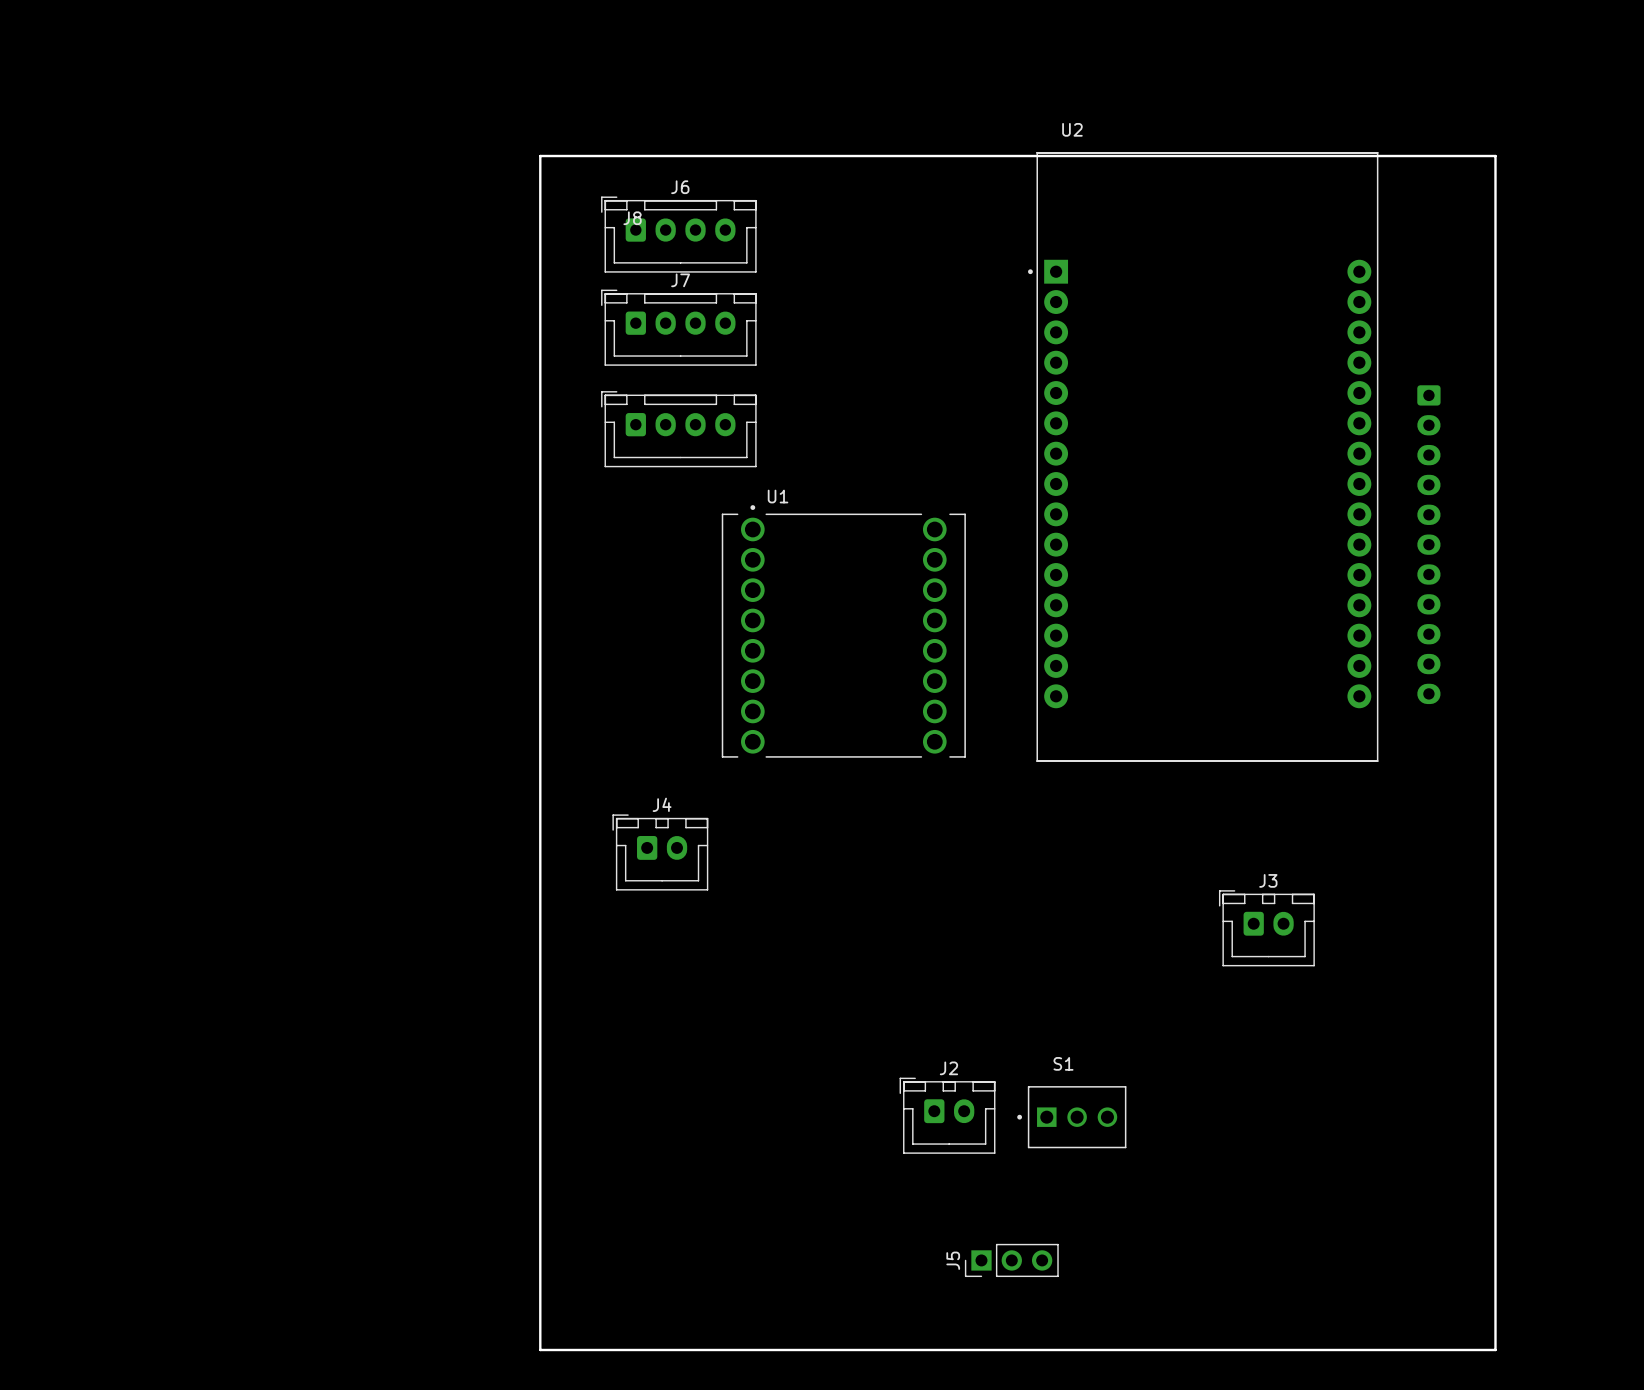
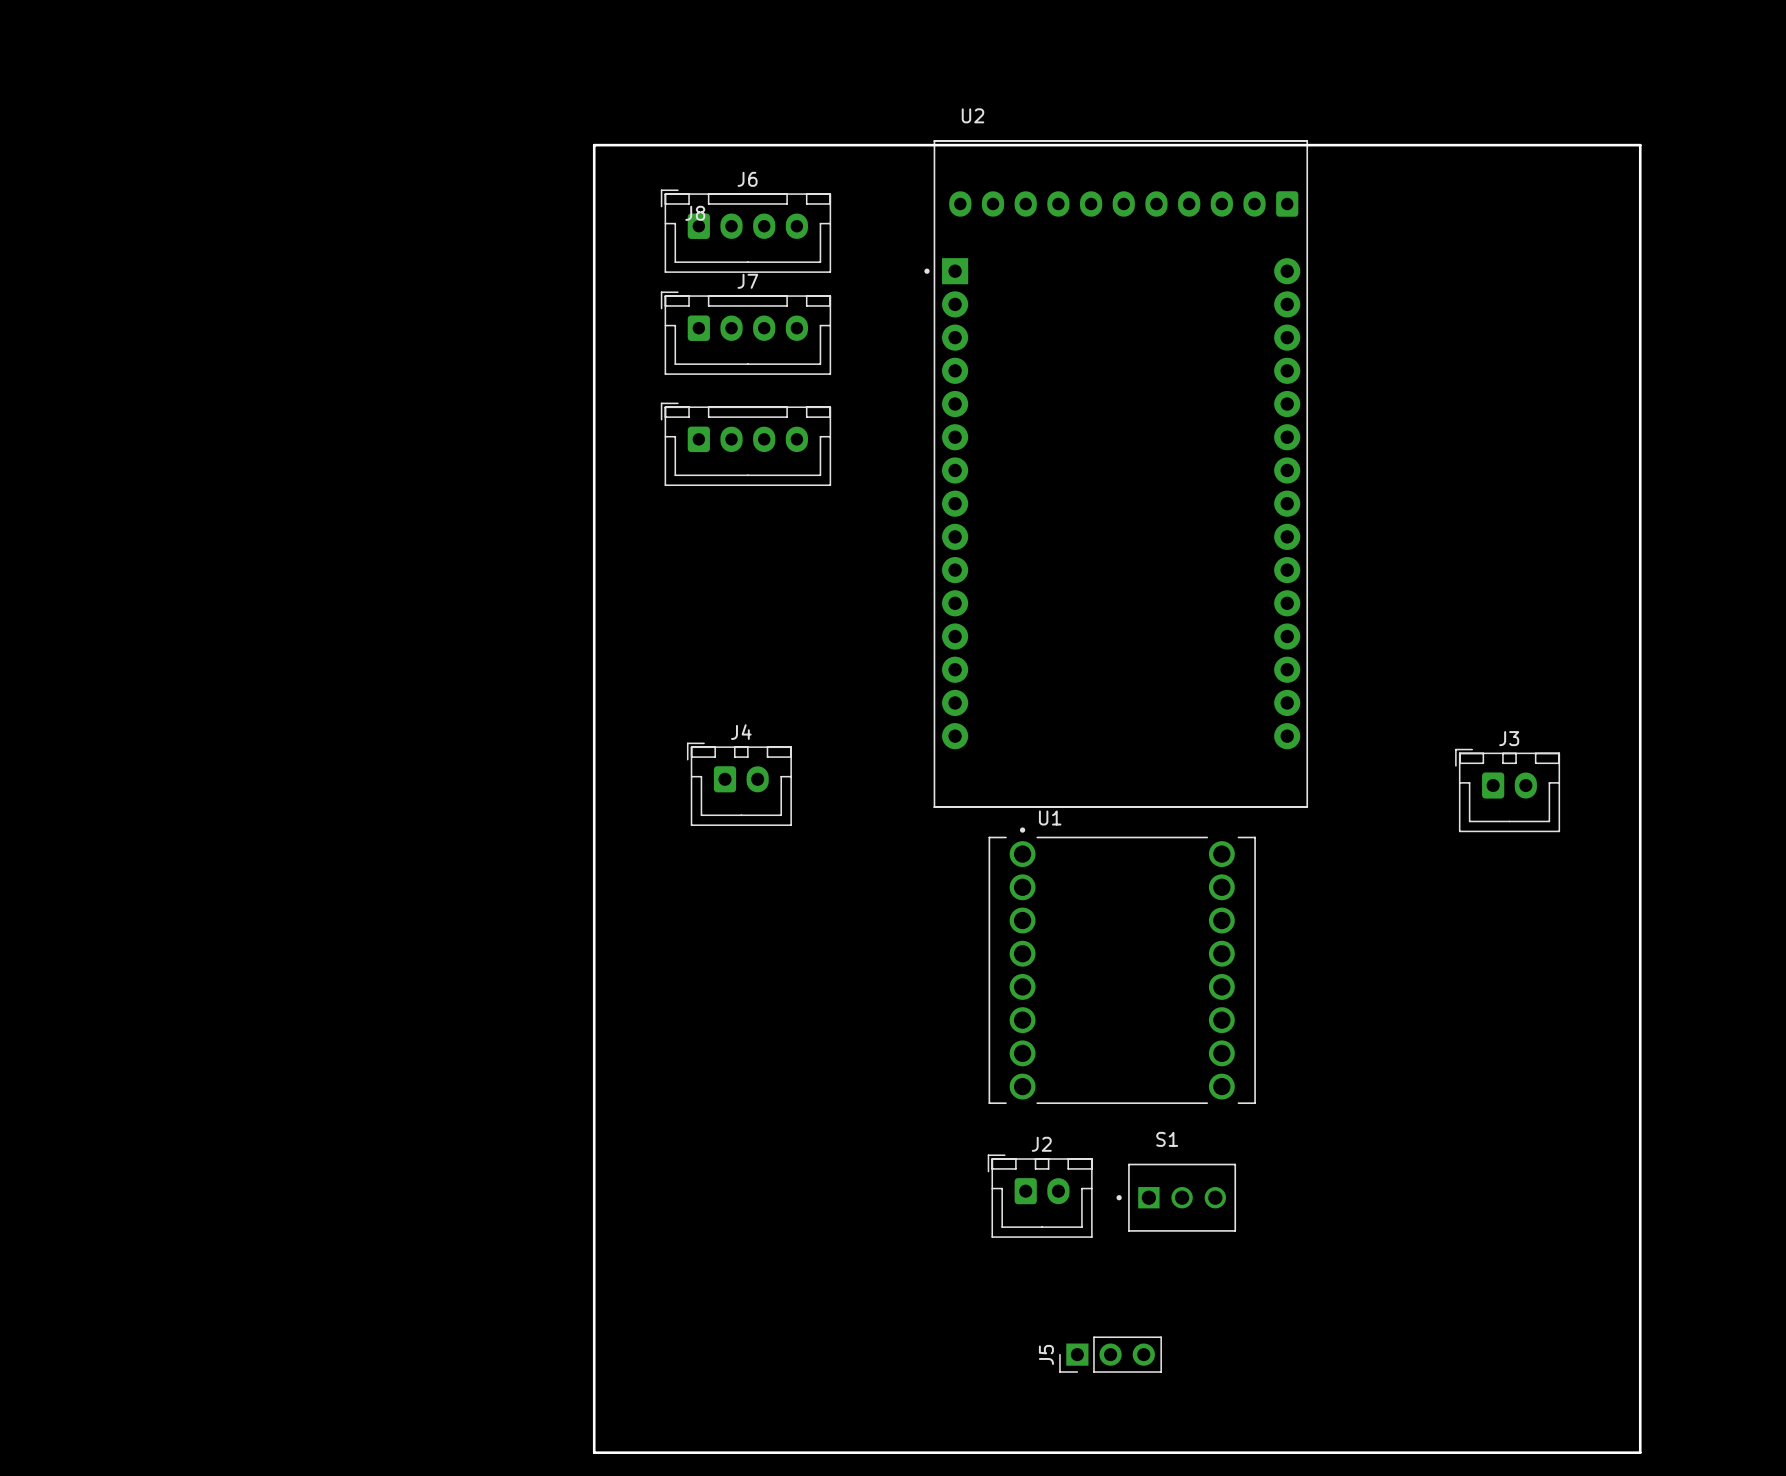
part: none -> (1123, 203)
U2 position: (1203, 456) -> (1116, 474)
part: (1428, 544) -> none
U1 position: (843, 631) -> (1122, 965)
J4 position: (660, 852) -> (739, 784)
J3 position: (1266, 928) -> (1507, 790)

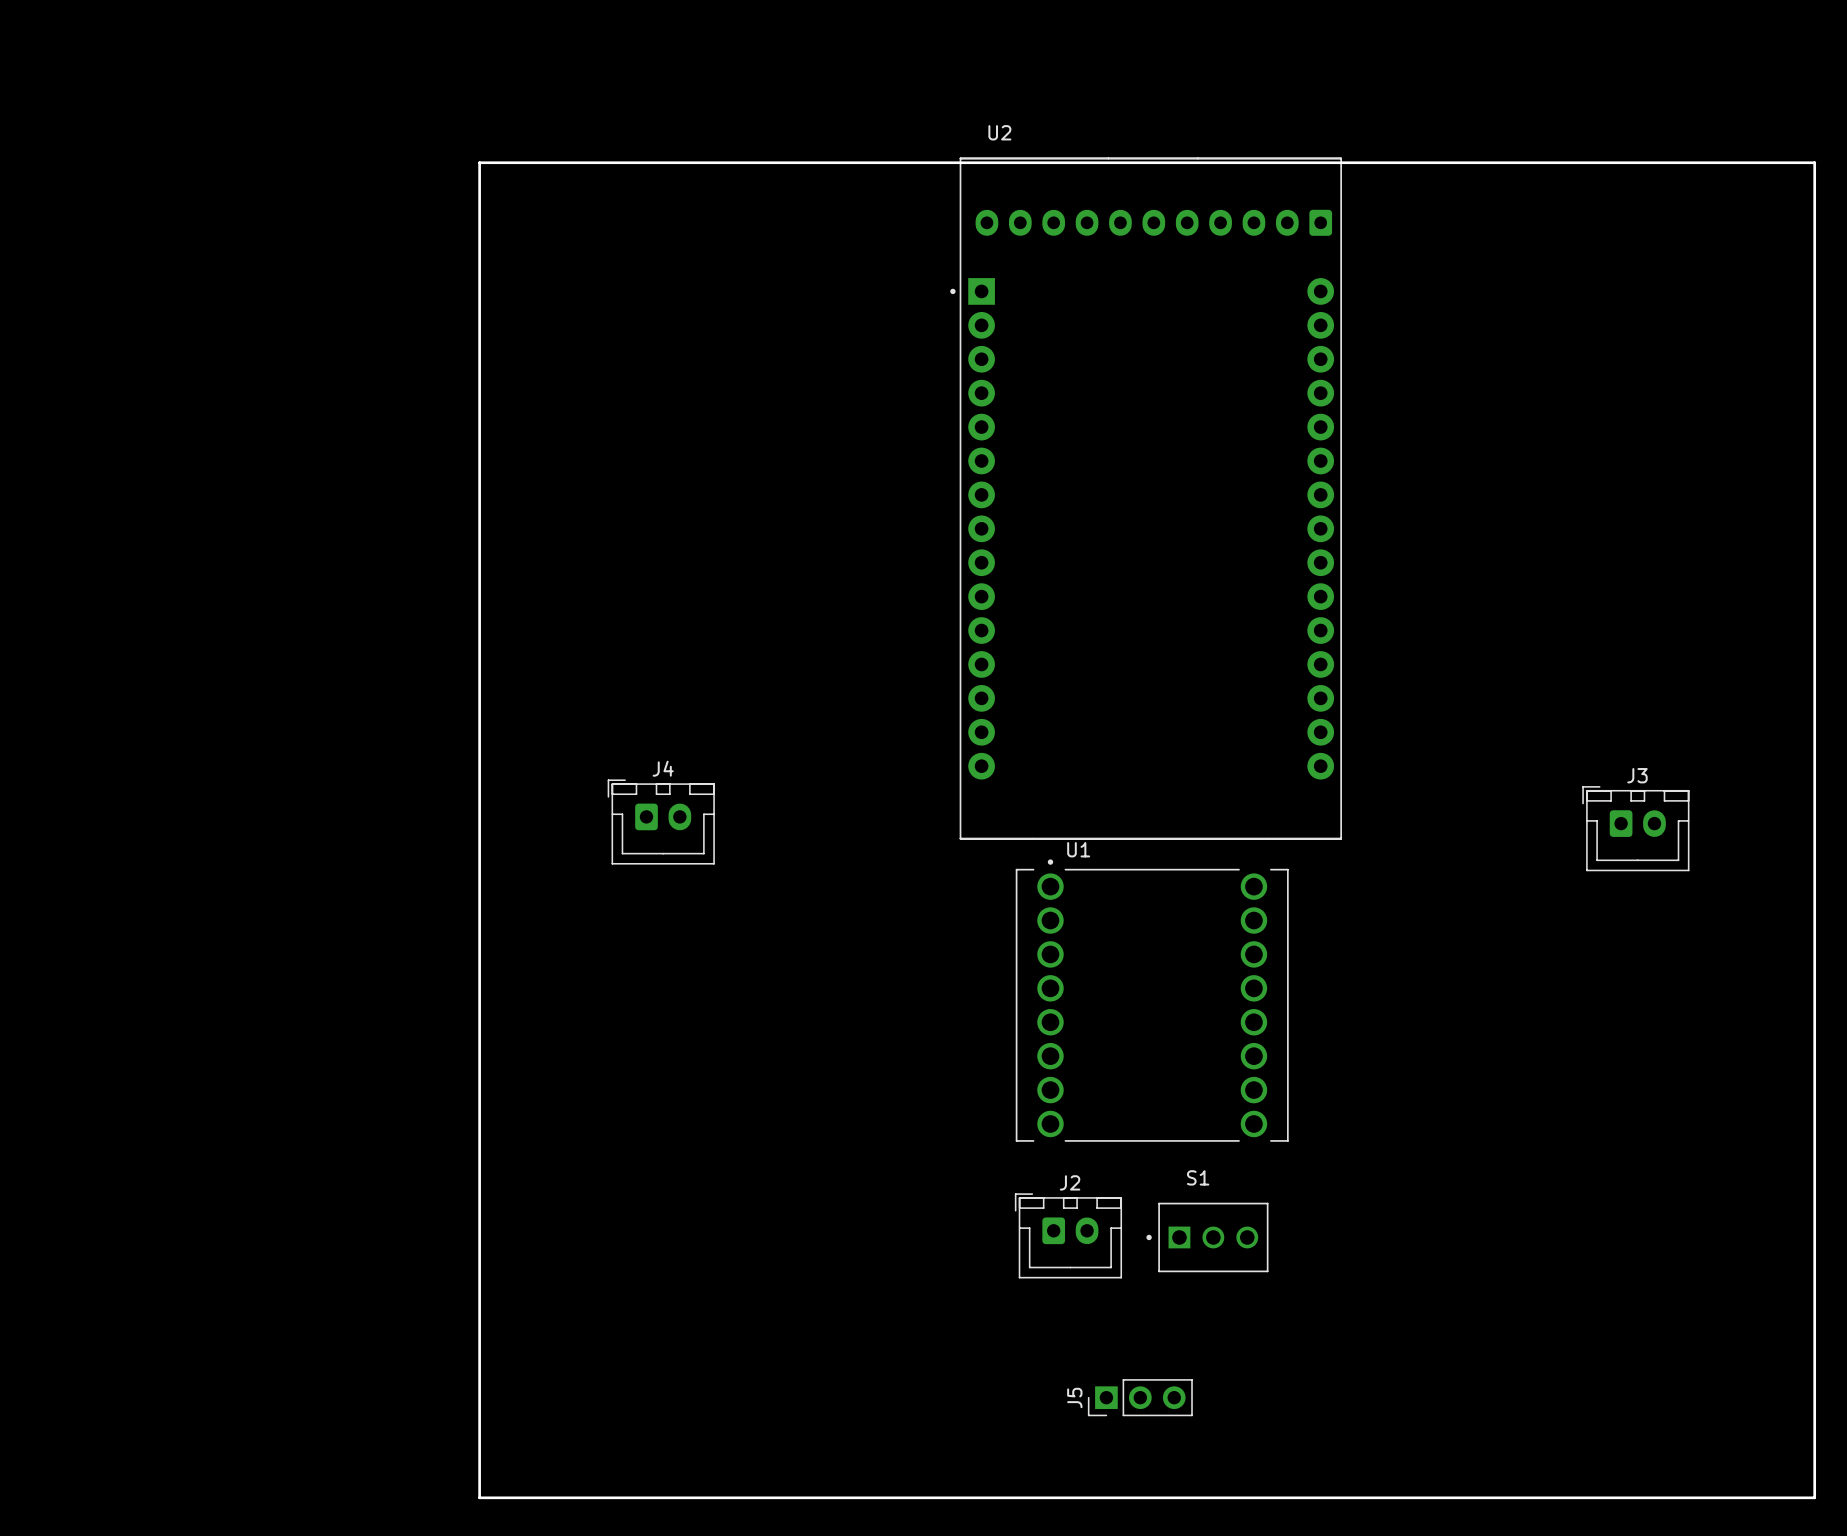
board edge: (594, 145) (594, 1452) -> (613, 162) (479, 162) (479, 1497) (613, 1497)
board edge: (1640, 145) (1640, 1452) -> (1681, 162) (1814, 162) (1814, 1497) (1681, 1497)
J6: (745, 231) -> none
J7: (745, 333) -> none
J8: (745, 444) -> none
J4 position: (739, 784) -> (661, 821)
J3 position: (1507, 790) -> (1635, 828)

